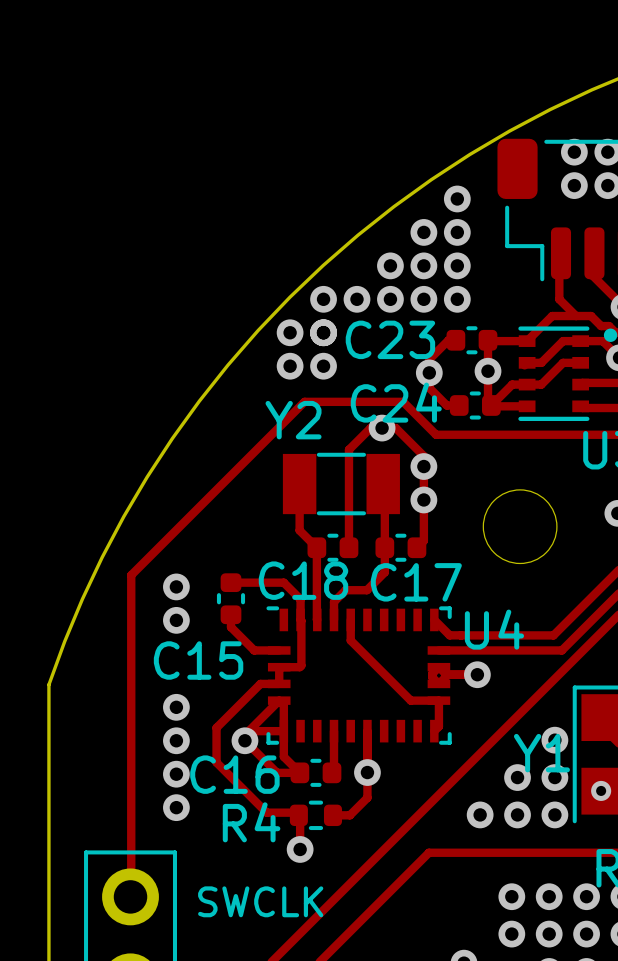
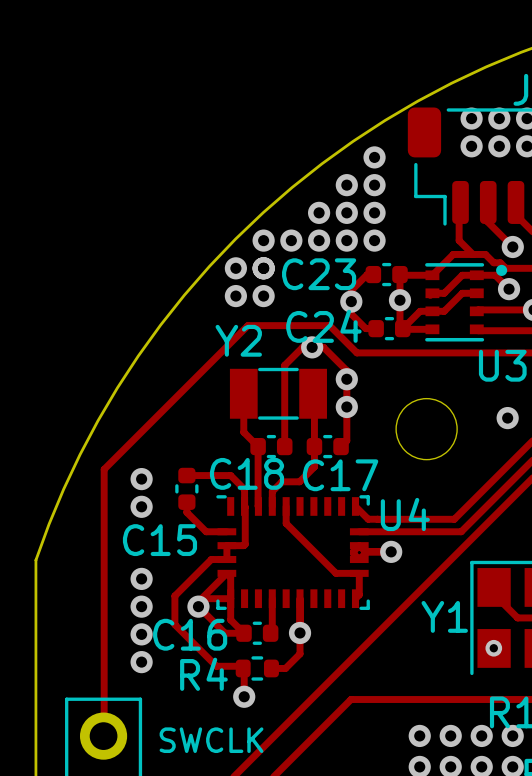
via: (554, 740) -> none
via: (517, 777) -> none
via: (554, 777) -> none
via: (480, 814) -> none
via: (517, 814) -> none
via: (554, 814) -> none

